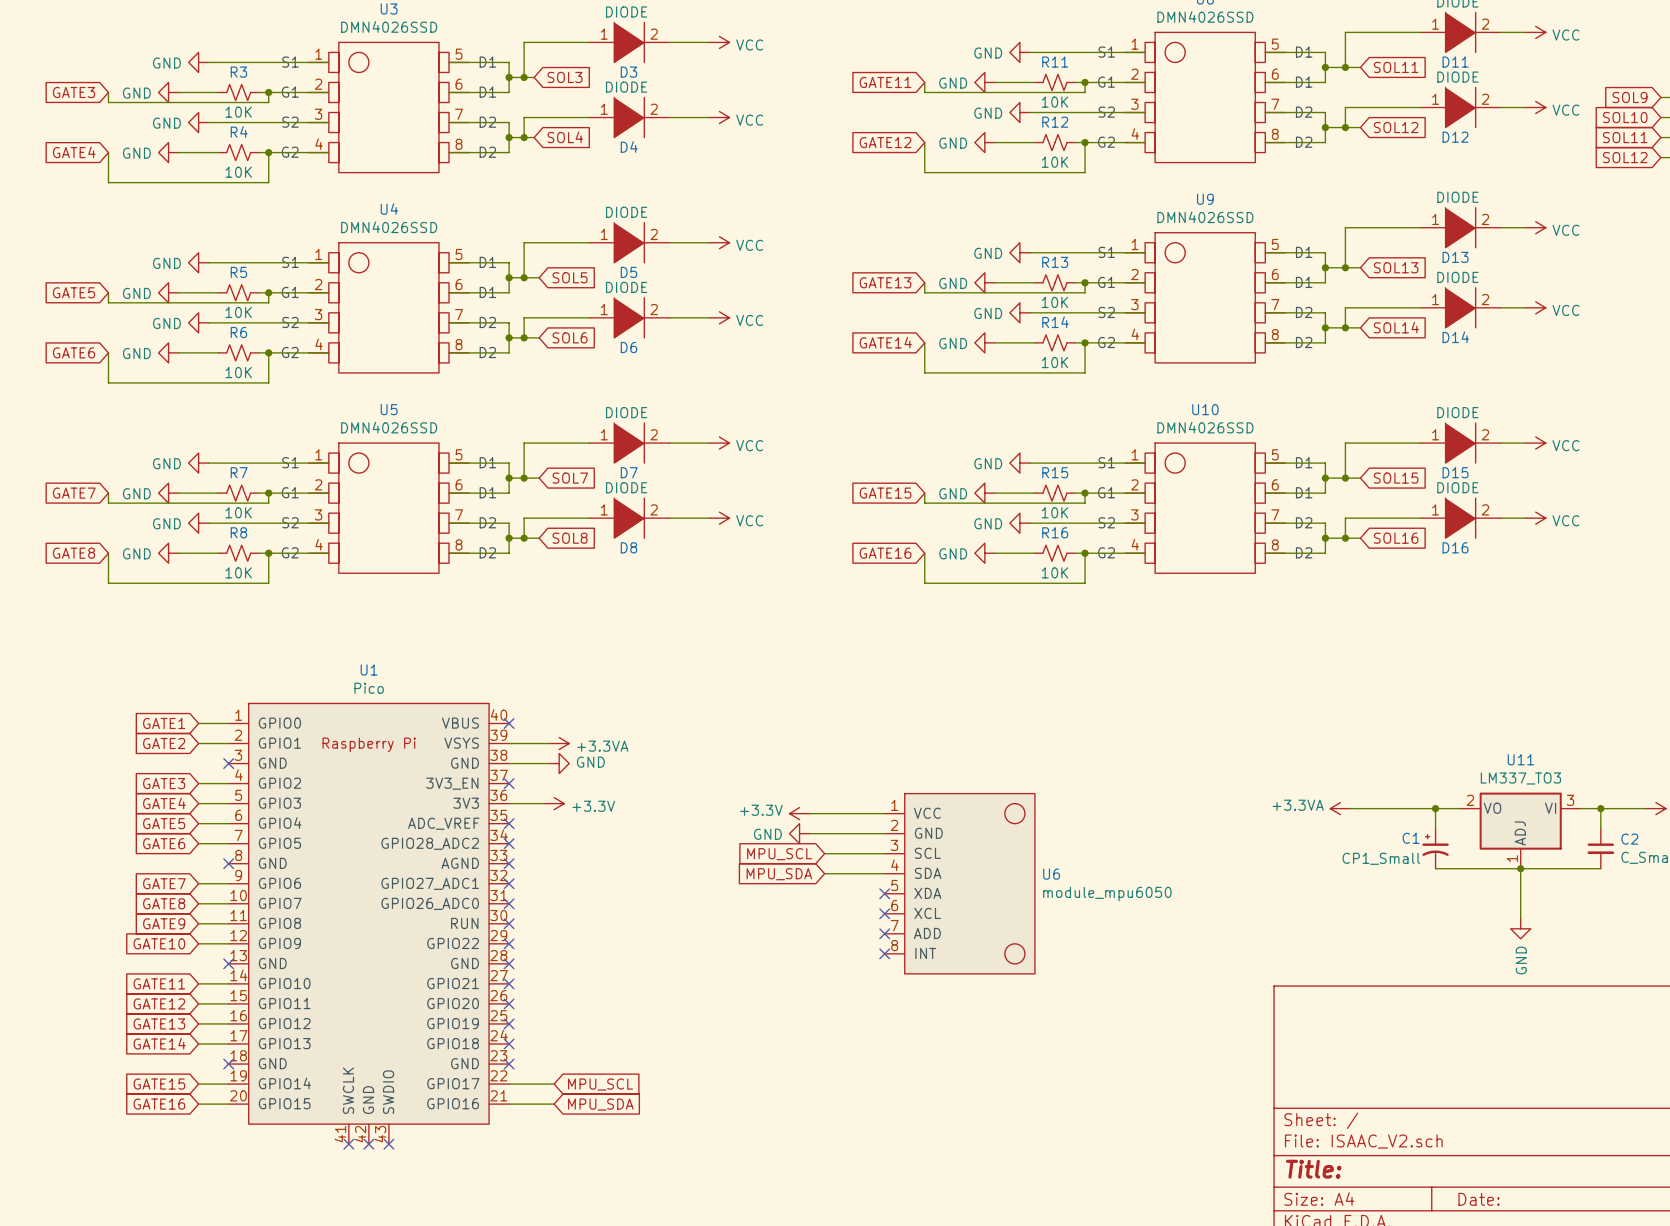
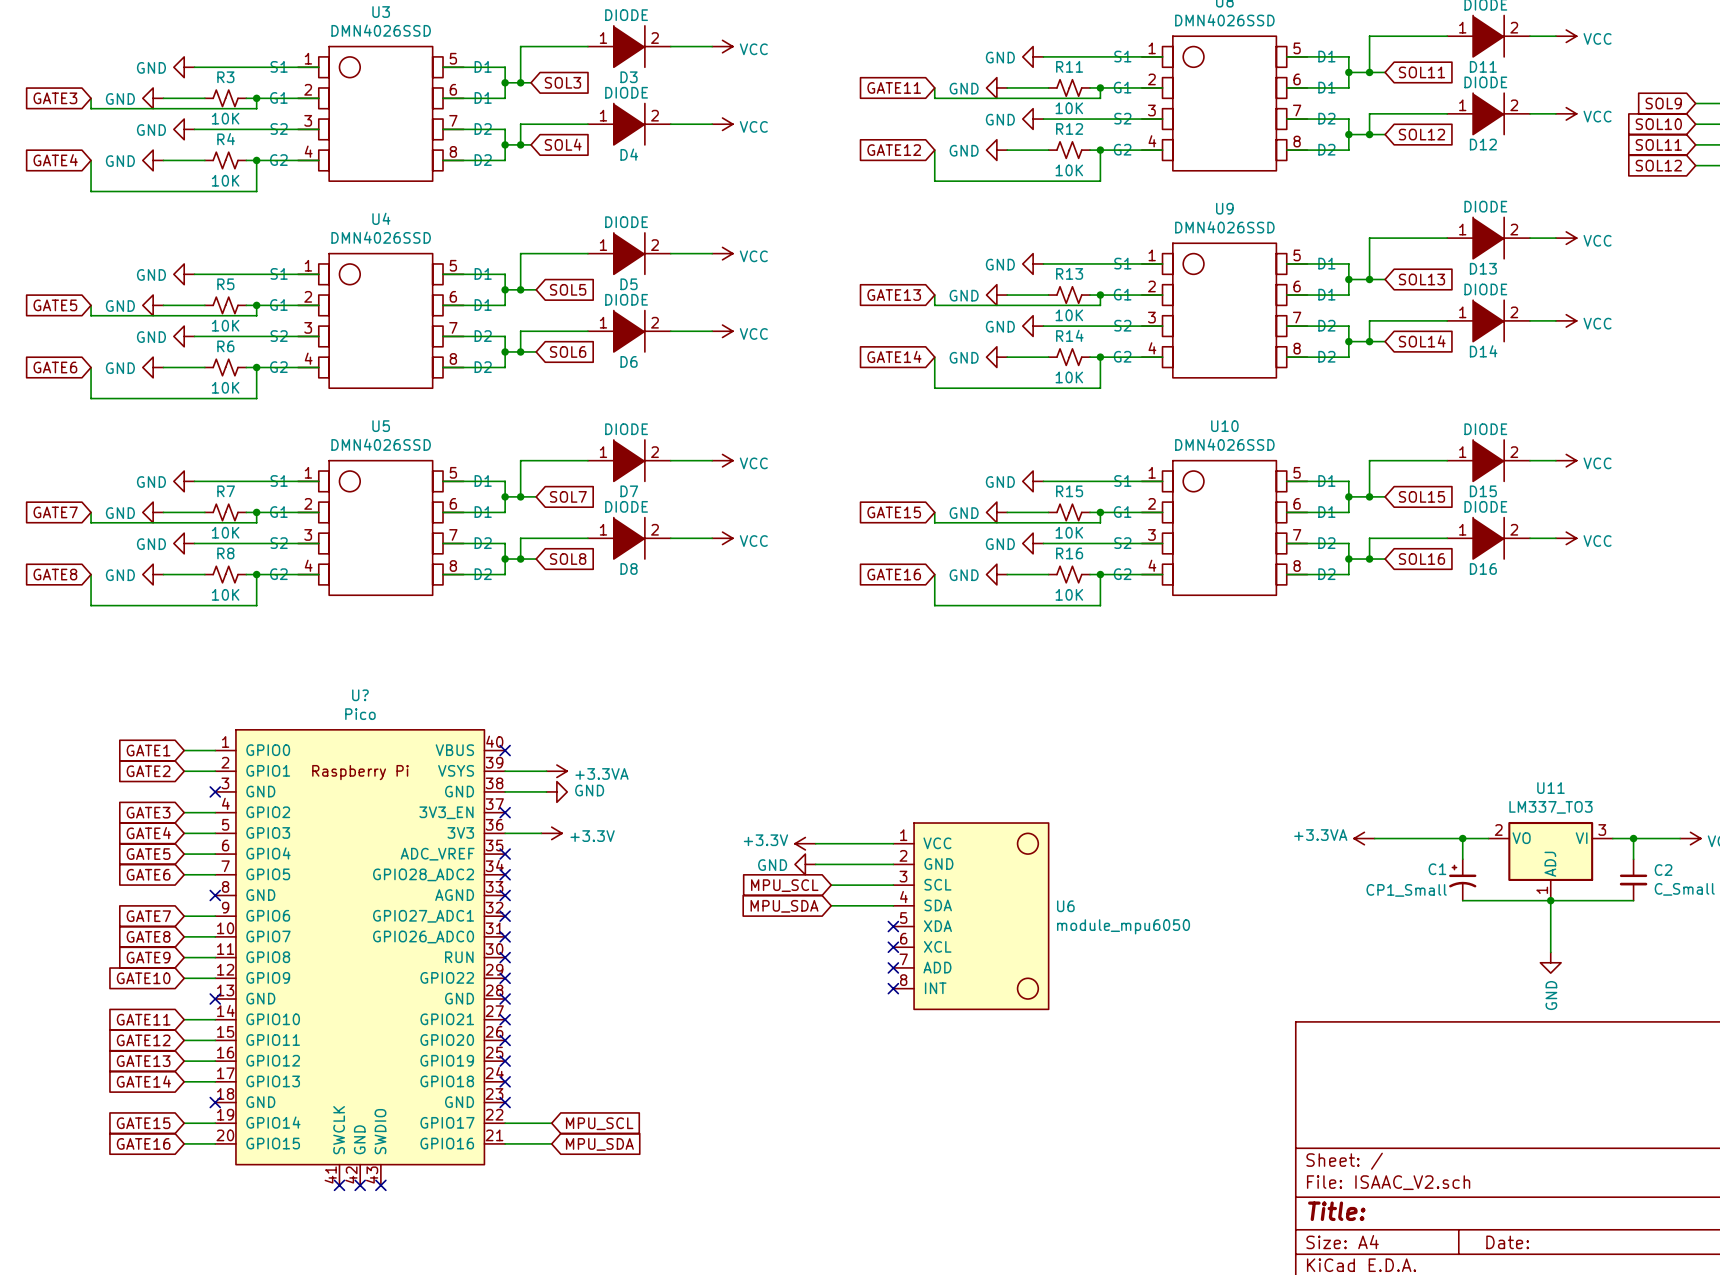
U1 name: U1 (369, 670) -> U? (360, 695)

